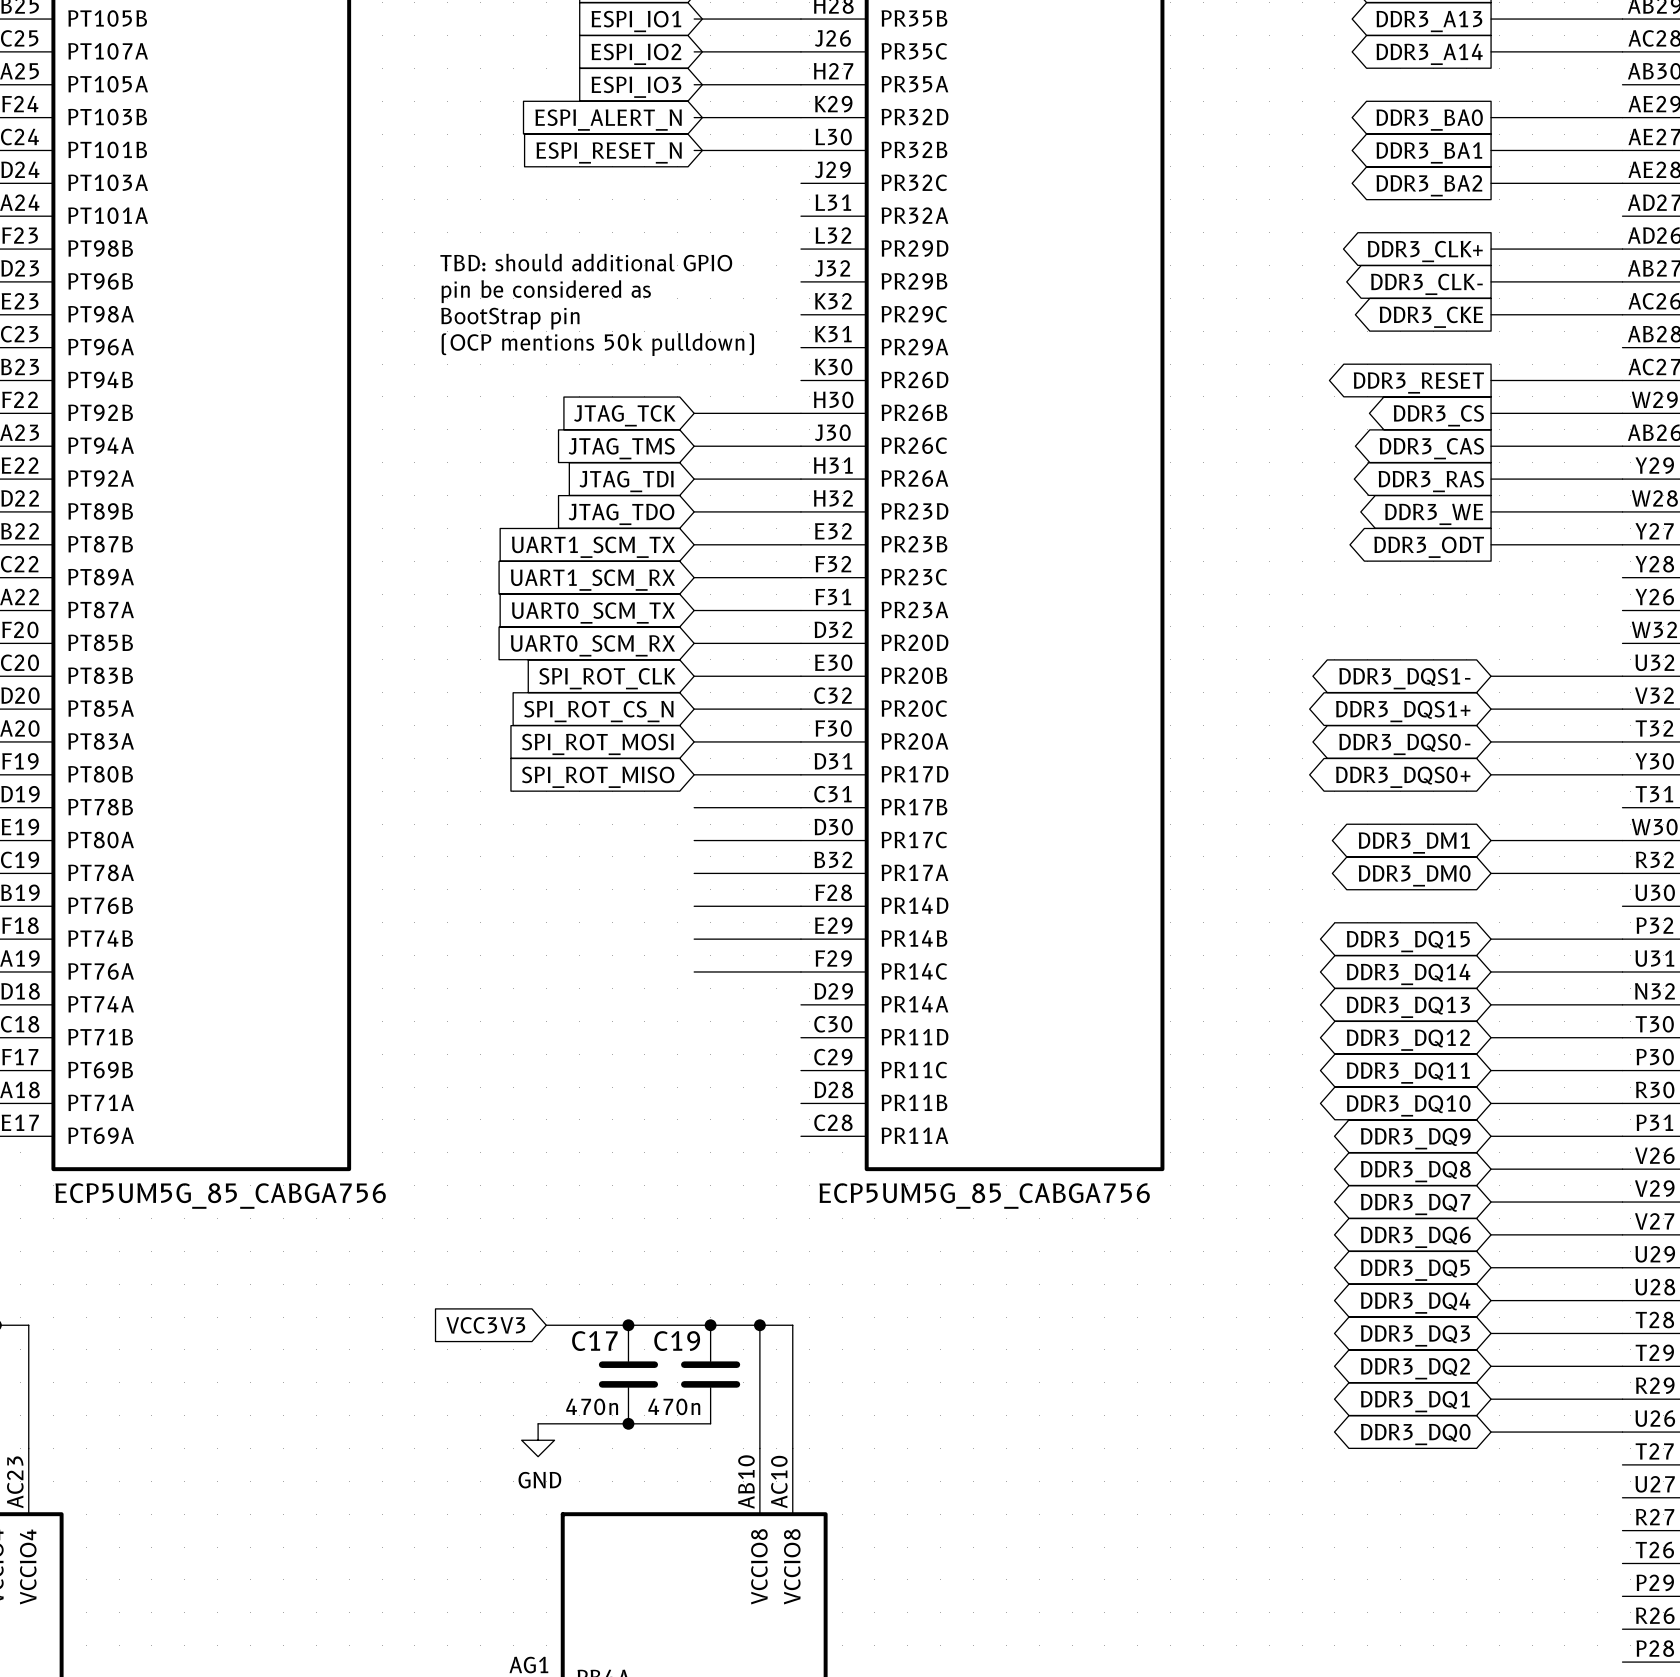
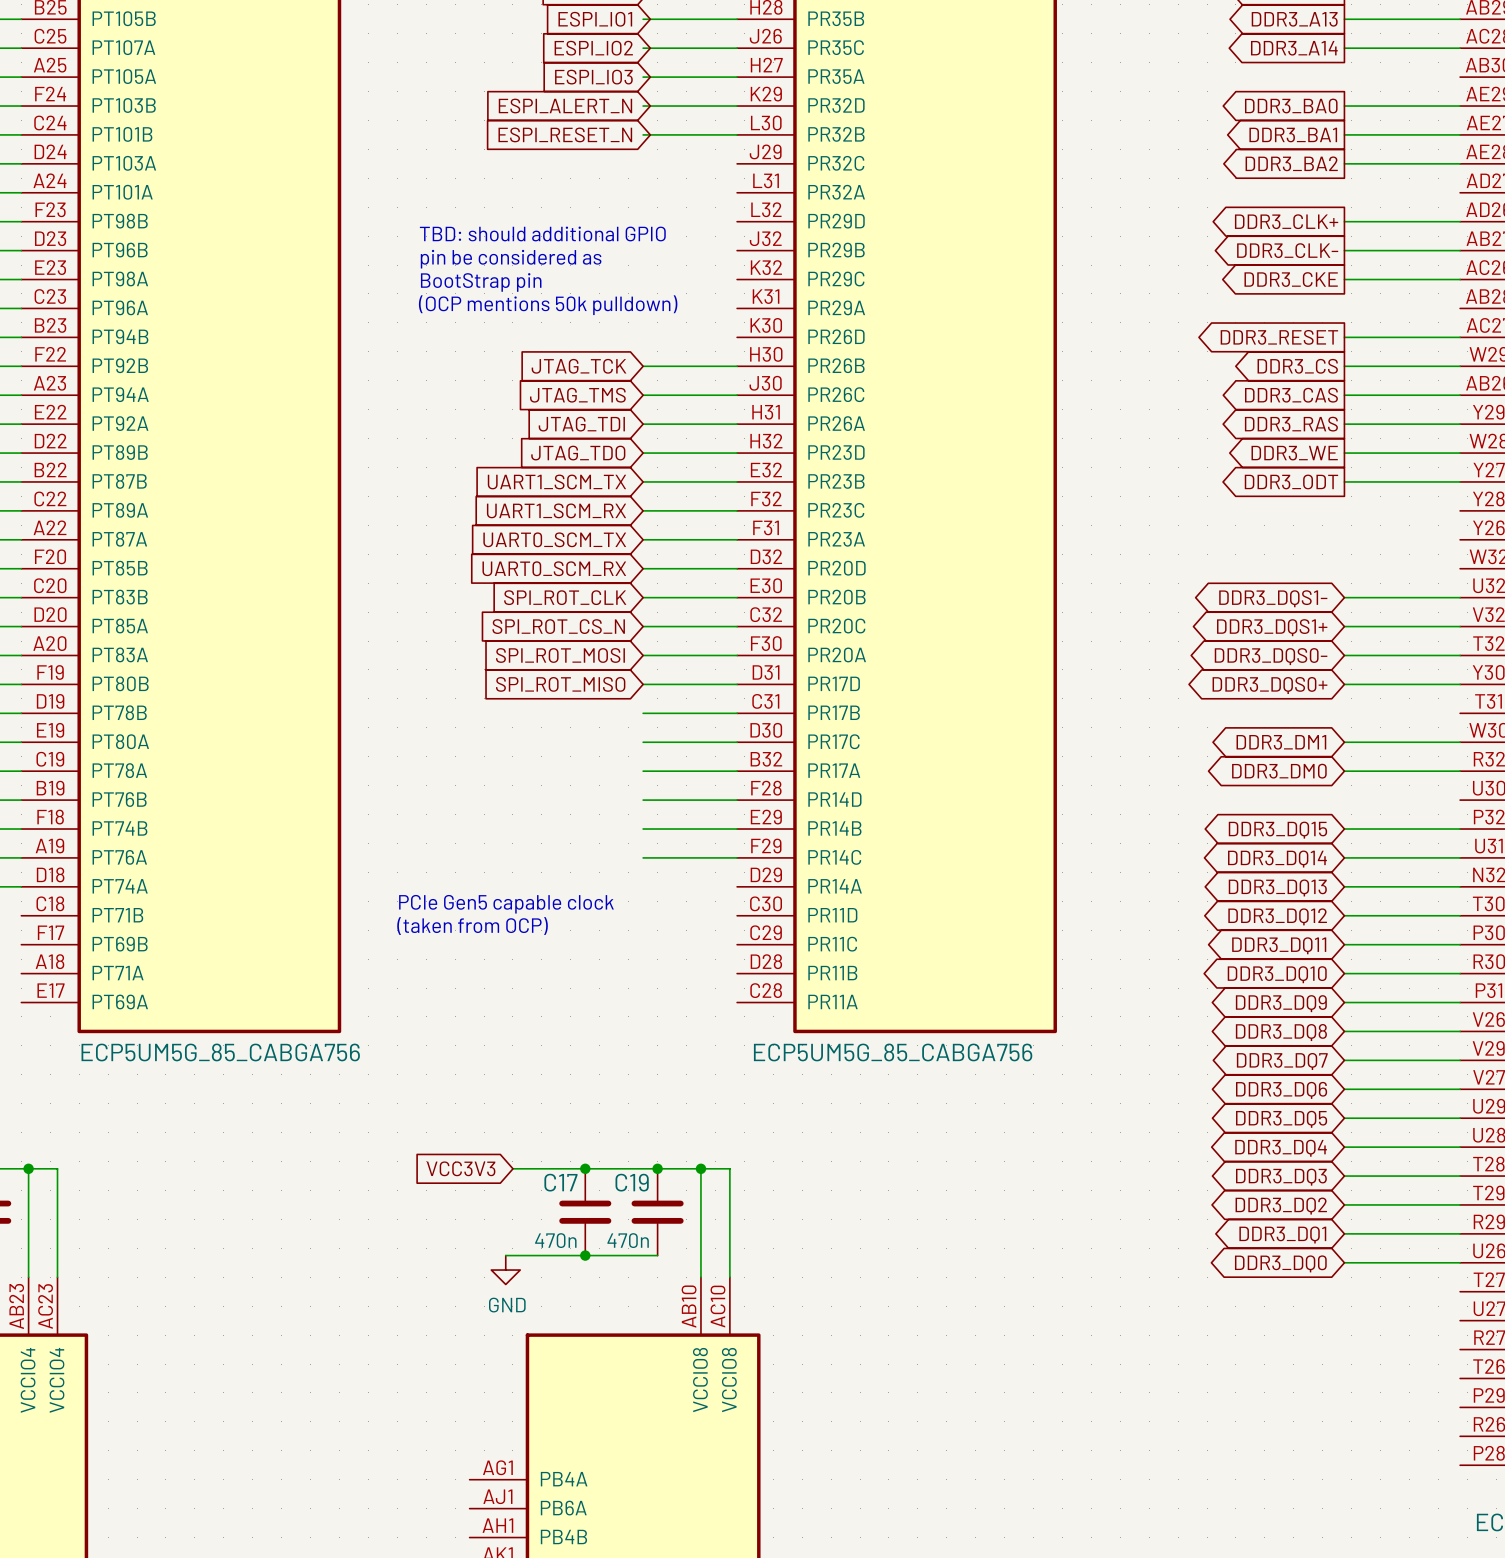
text: none -> PCIe Gen5 capable clock (506, 904)
text: none -> (taken from OCP) (472, 926)

